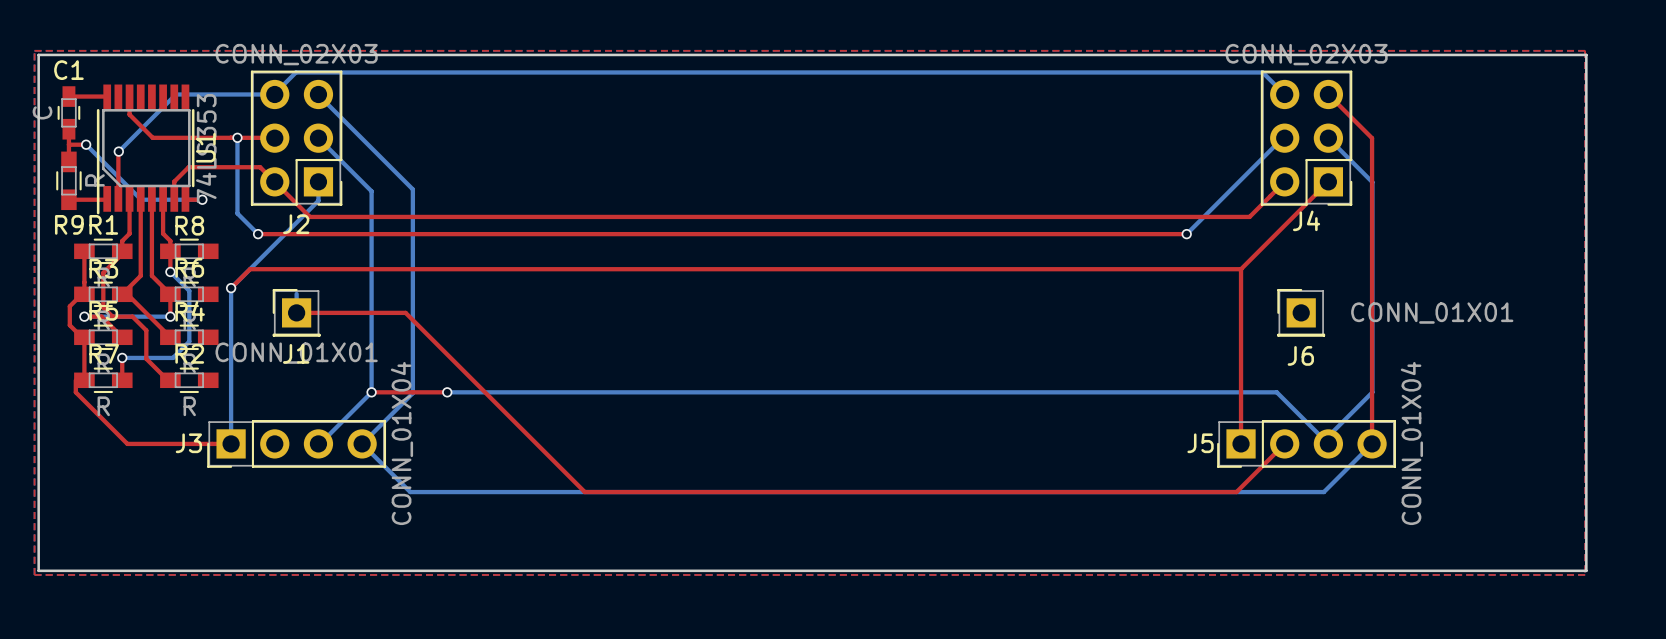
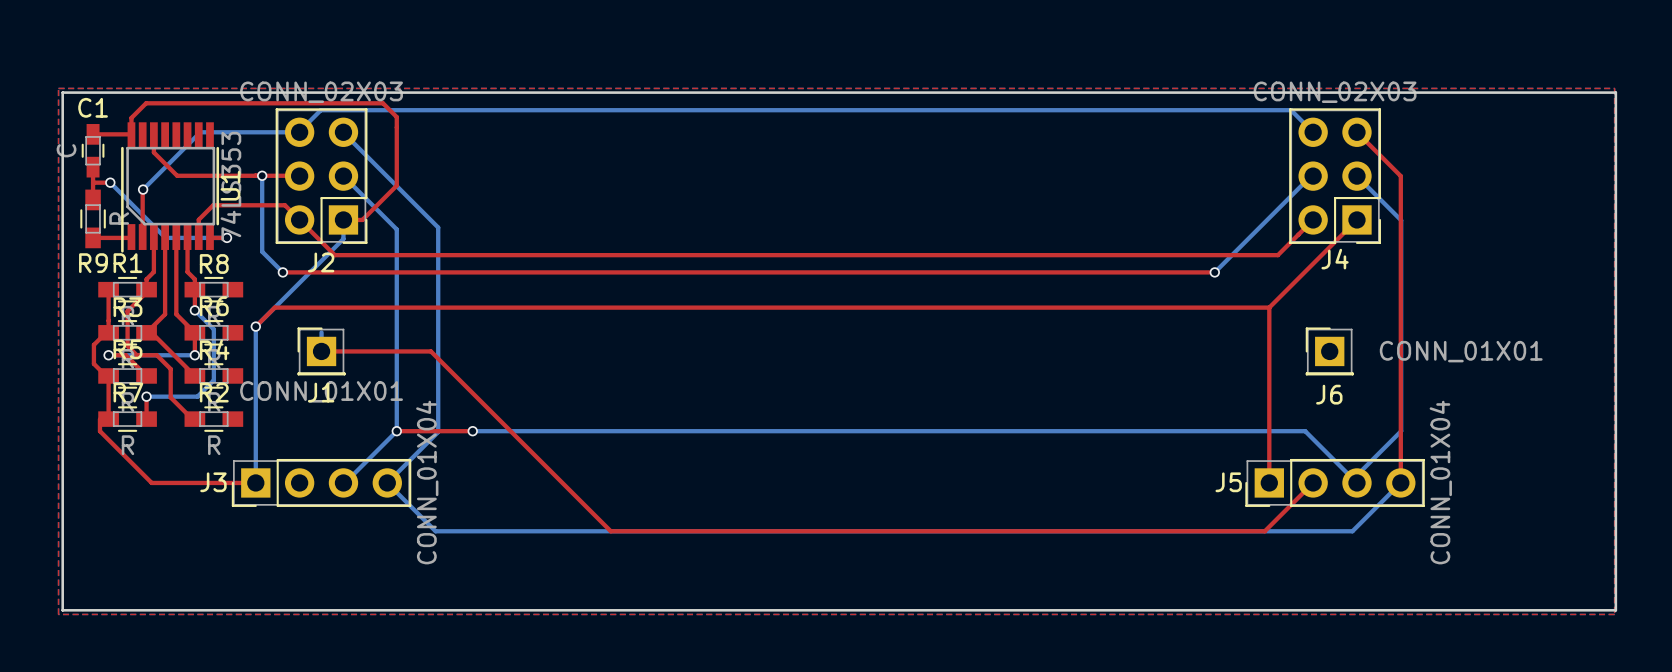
top track: none -> (131, 135) (131, 117) (146, 103) (382, 103) (396, 117) (396, 185) (362, 219) (343, 219)

